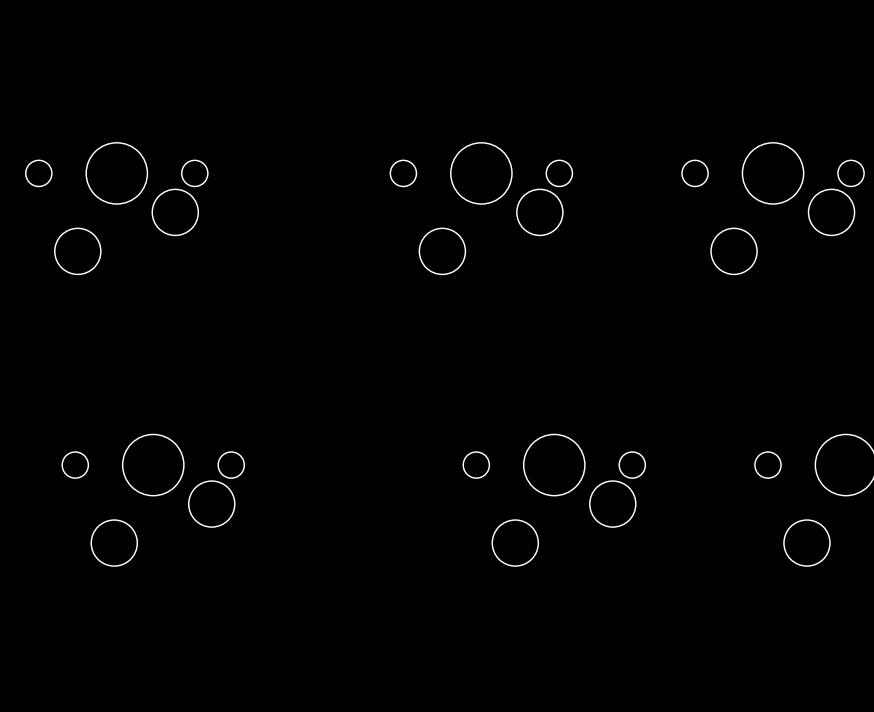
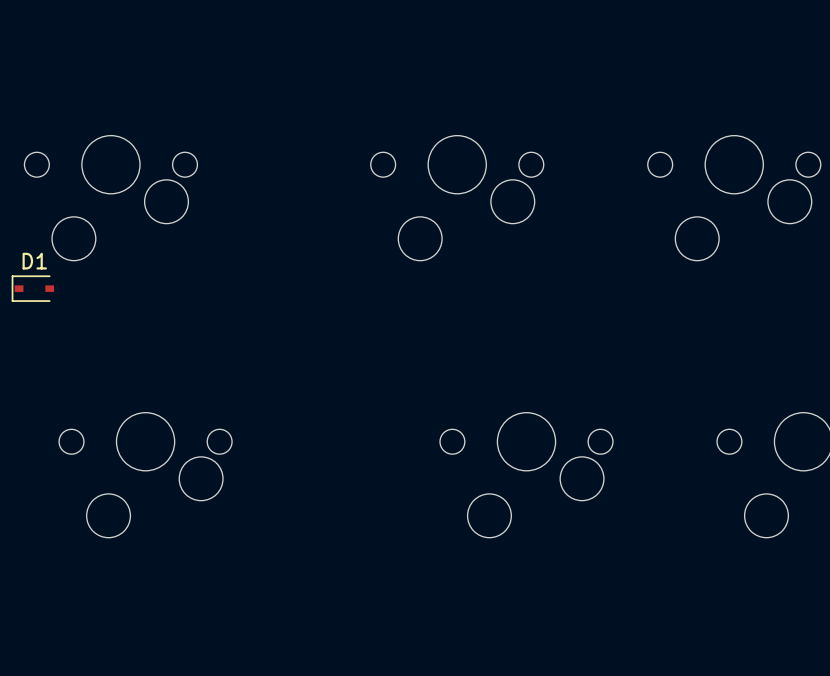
D1: none -> (32, 288)

